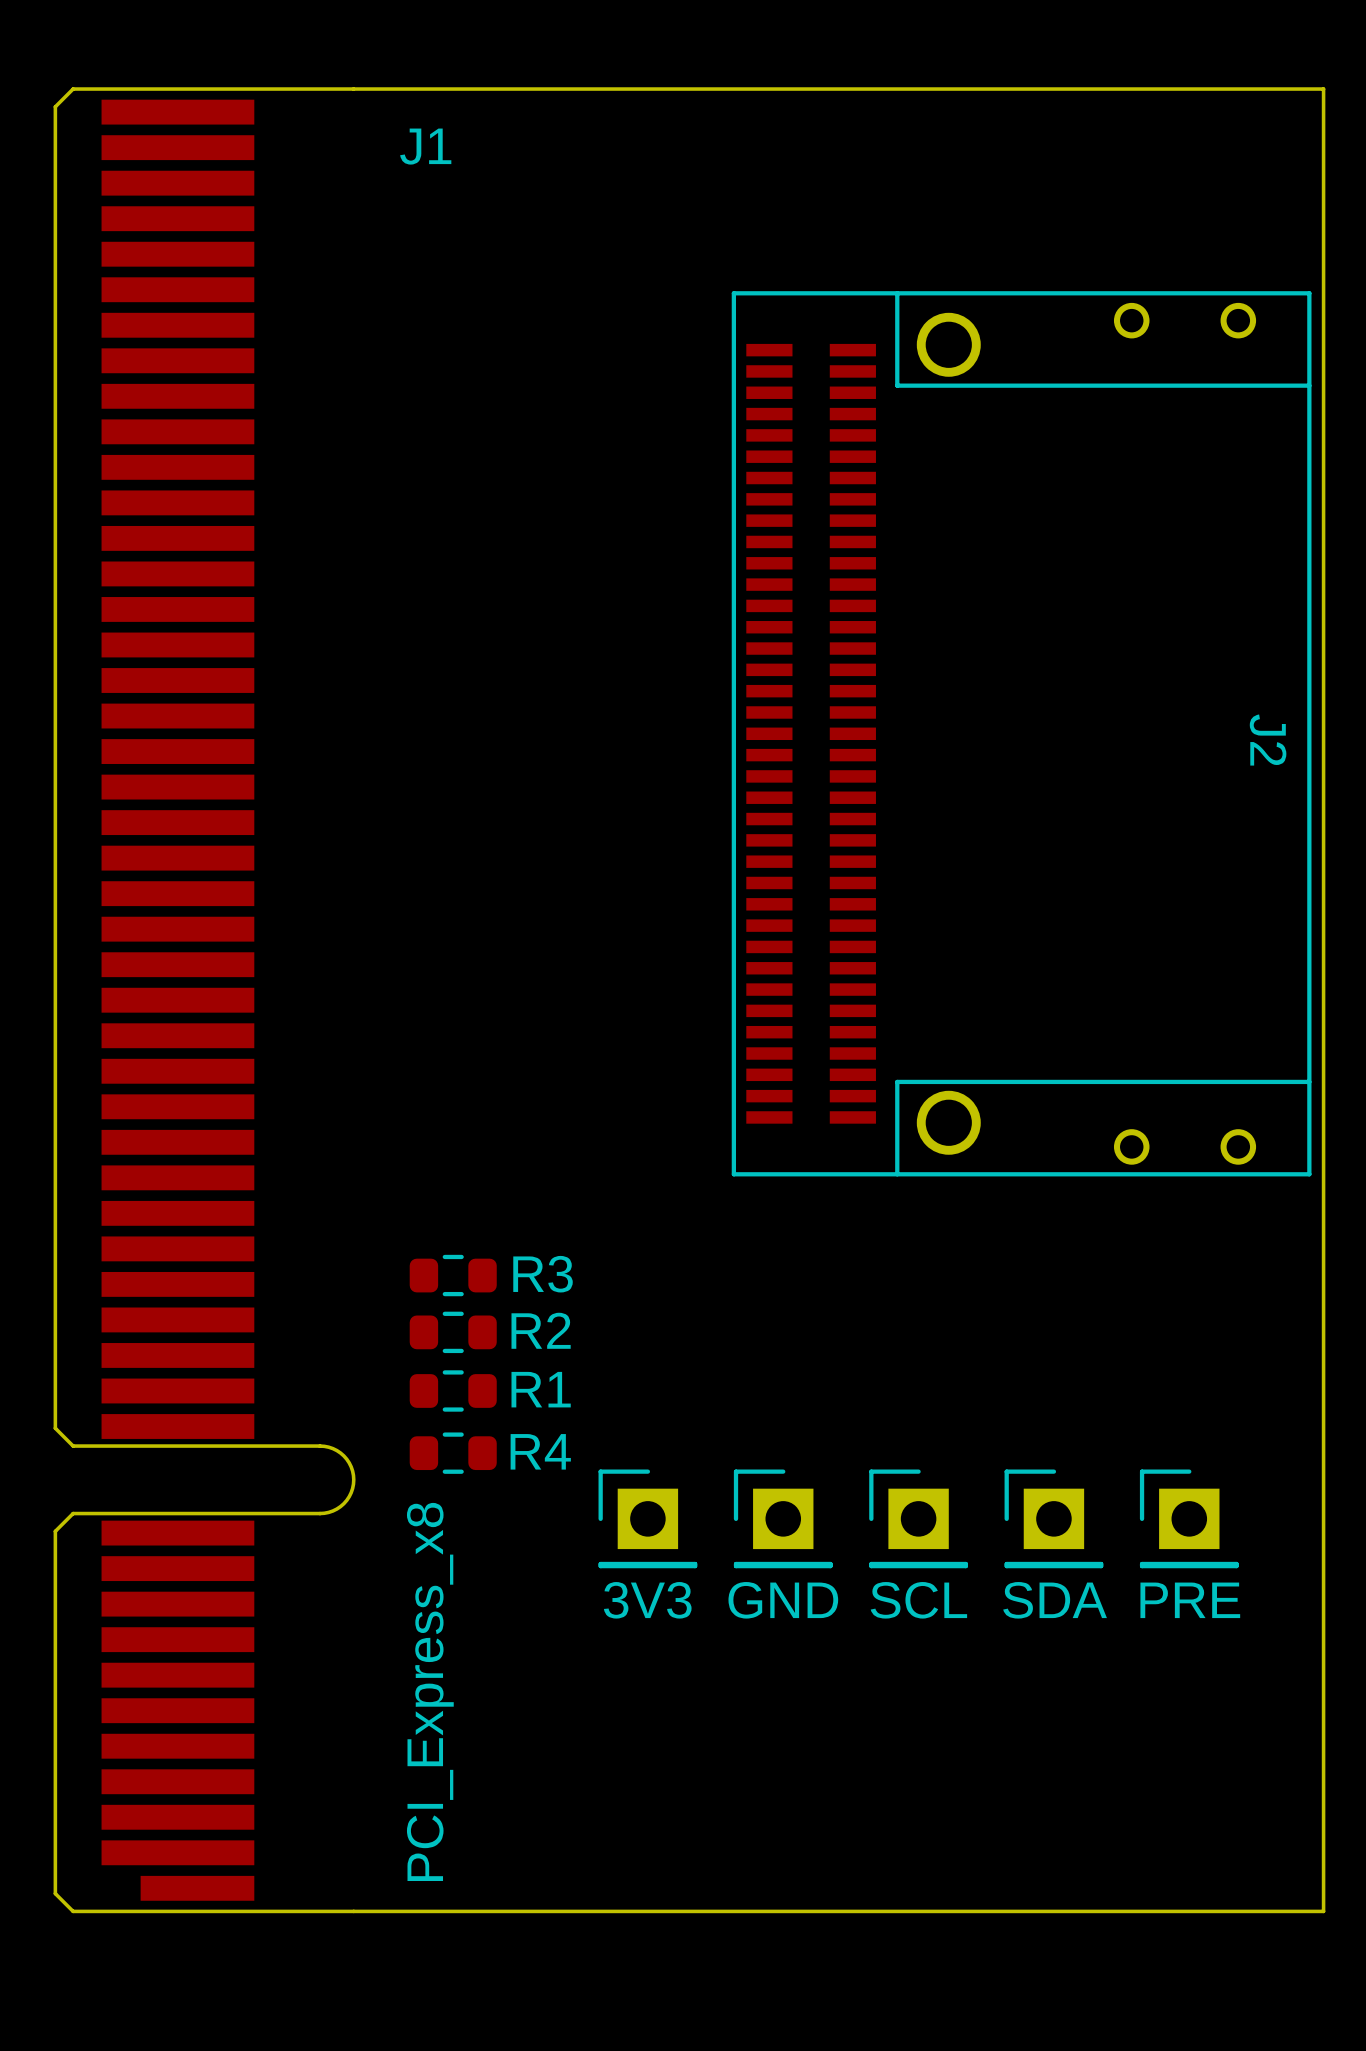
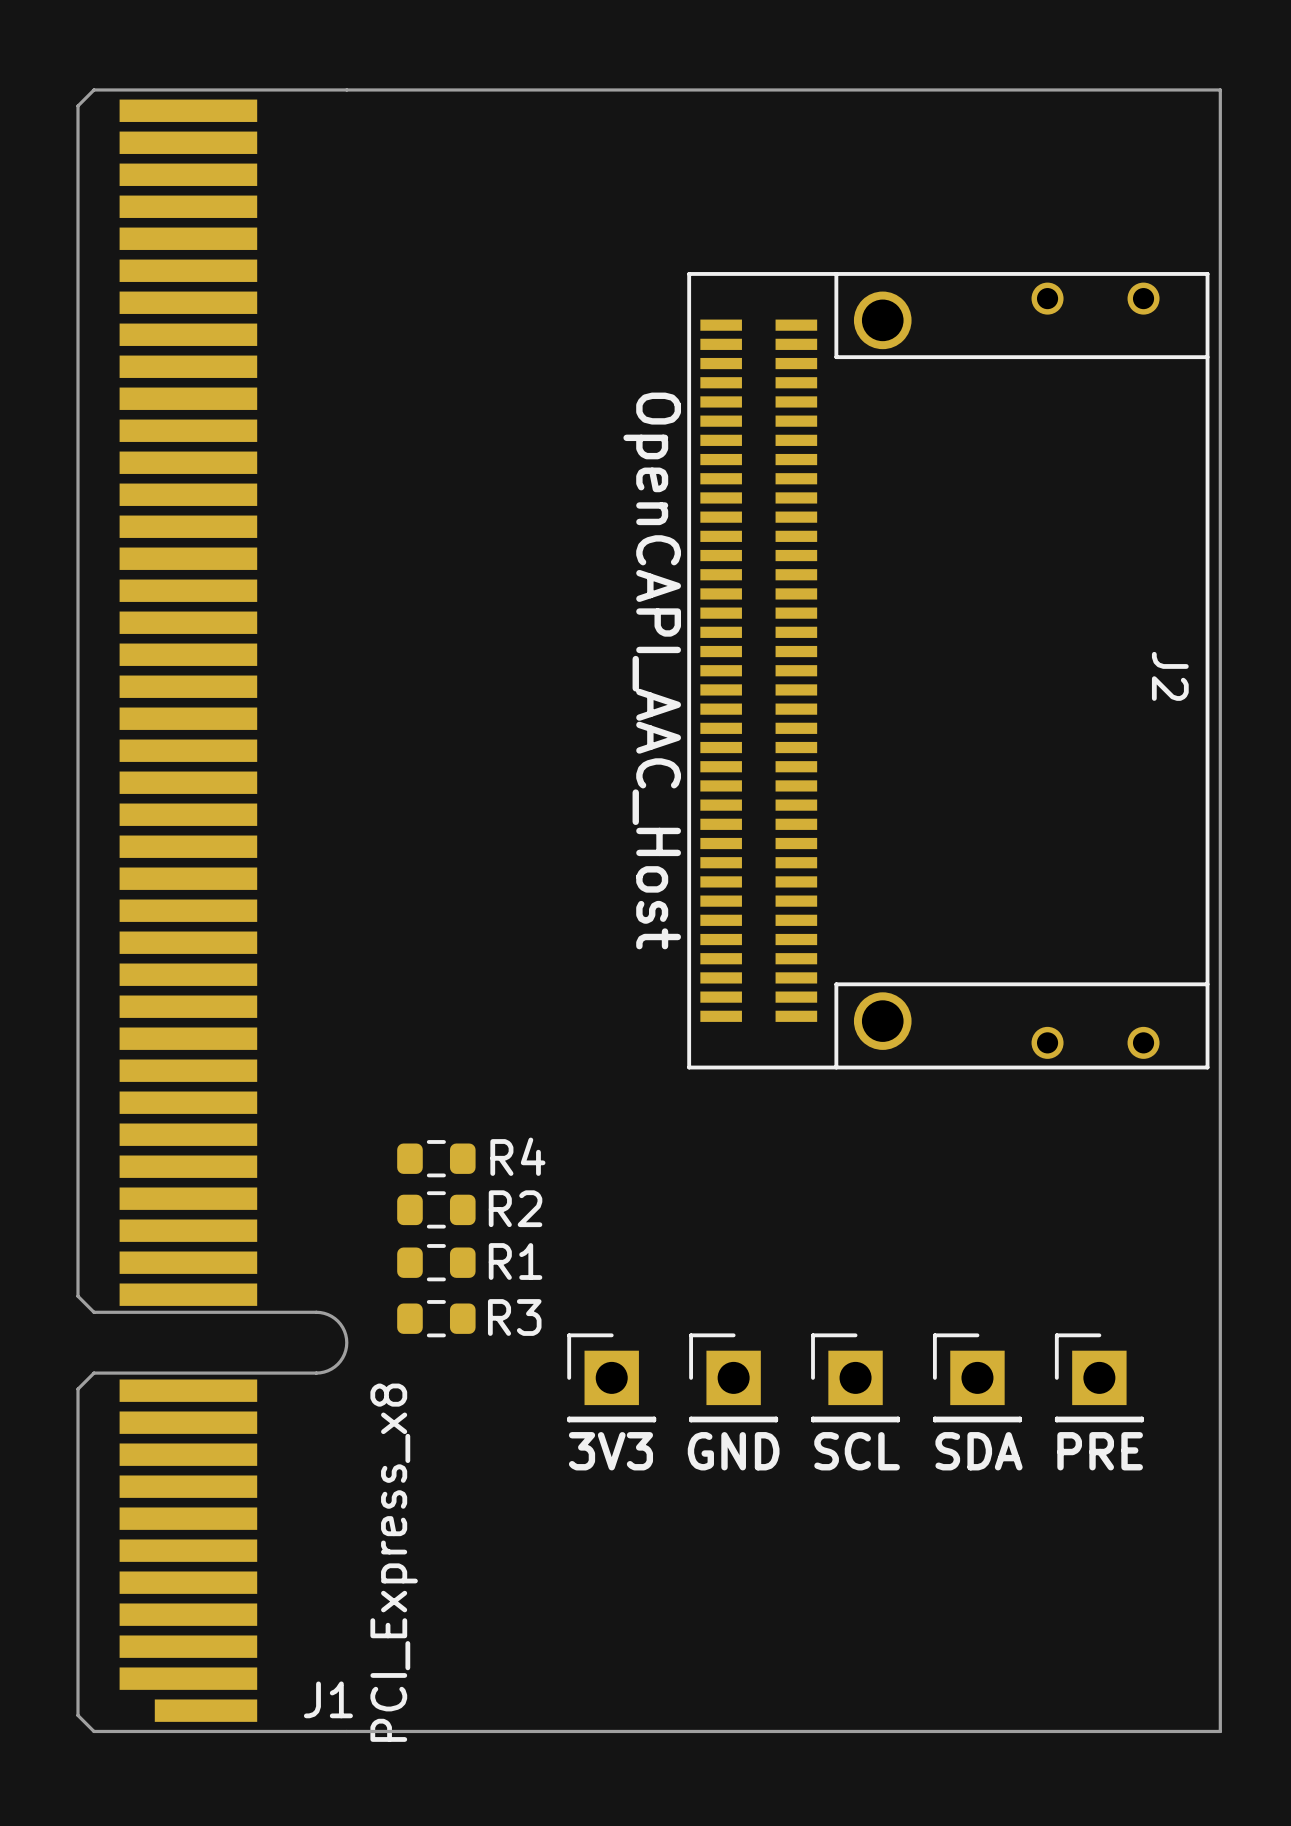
J1 name position: J1 (425, 146) -> J1 (328, 1699)
J2 value: none -> OpenCAPI_AAC_Host (652, 670)
R3 name: R3 (543, 1274) -> R4 (517, 1156)
R4 name: R4 (540, 1451) -> R3 (514, 1317)
J1 value position: PCI_Express_x8 (430, 1691) -> PCI_Express_x8 (394, 1562)

